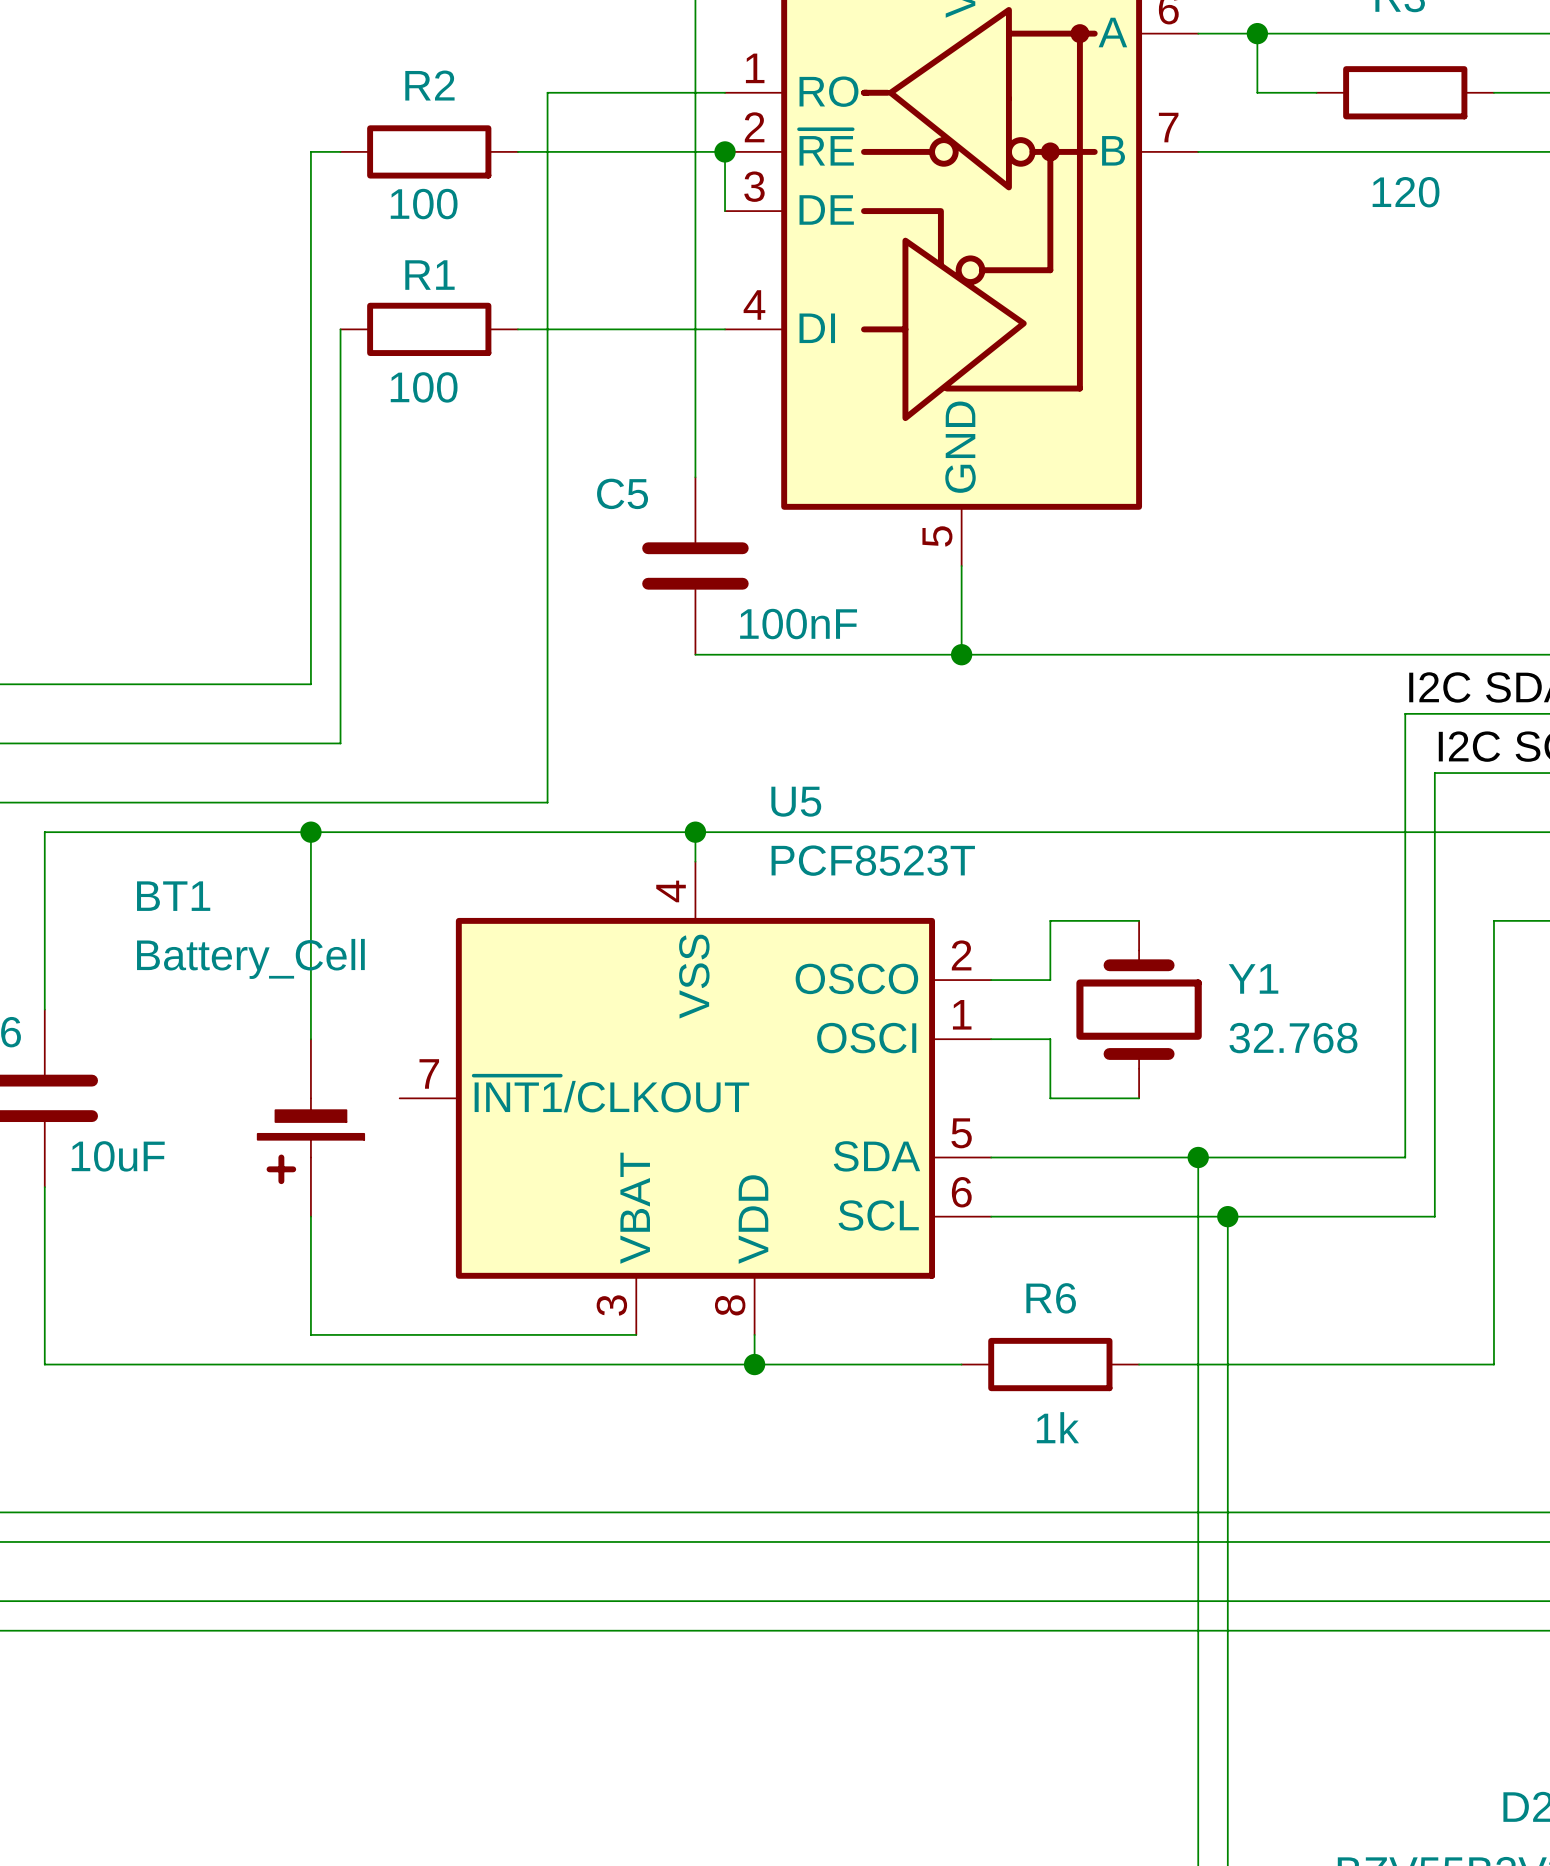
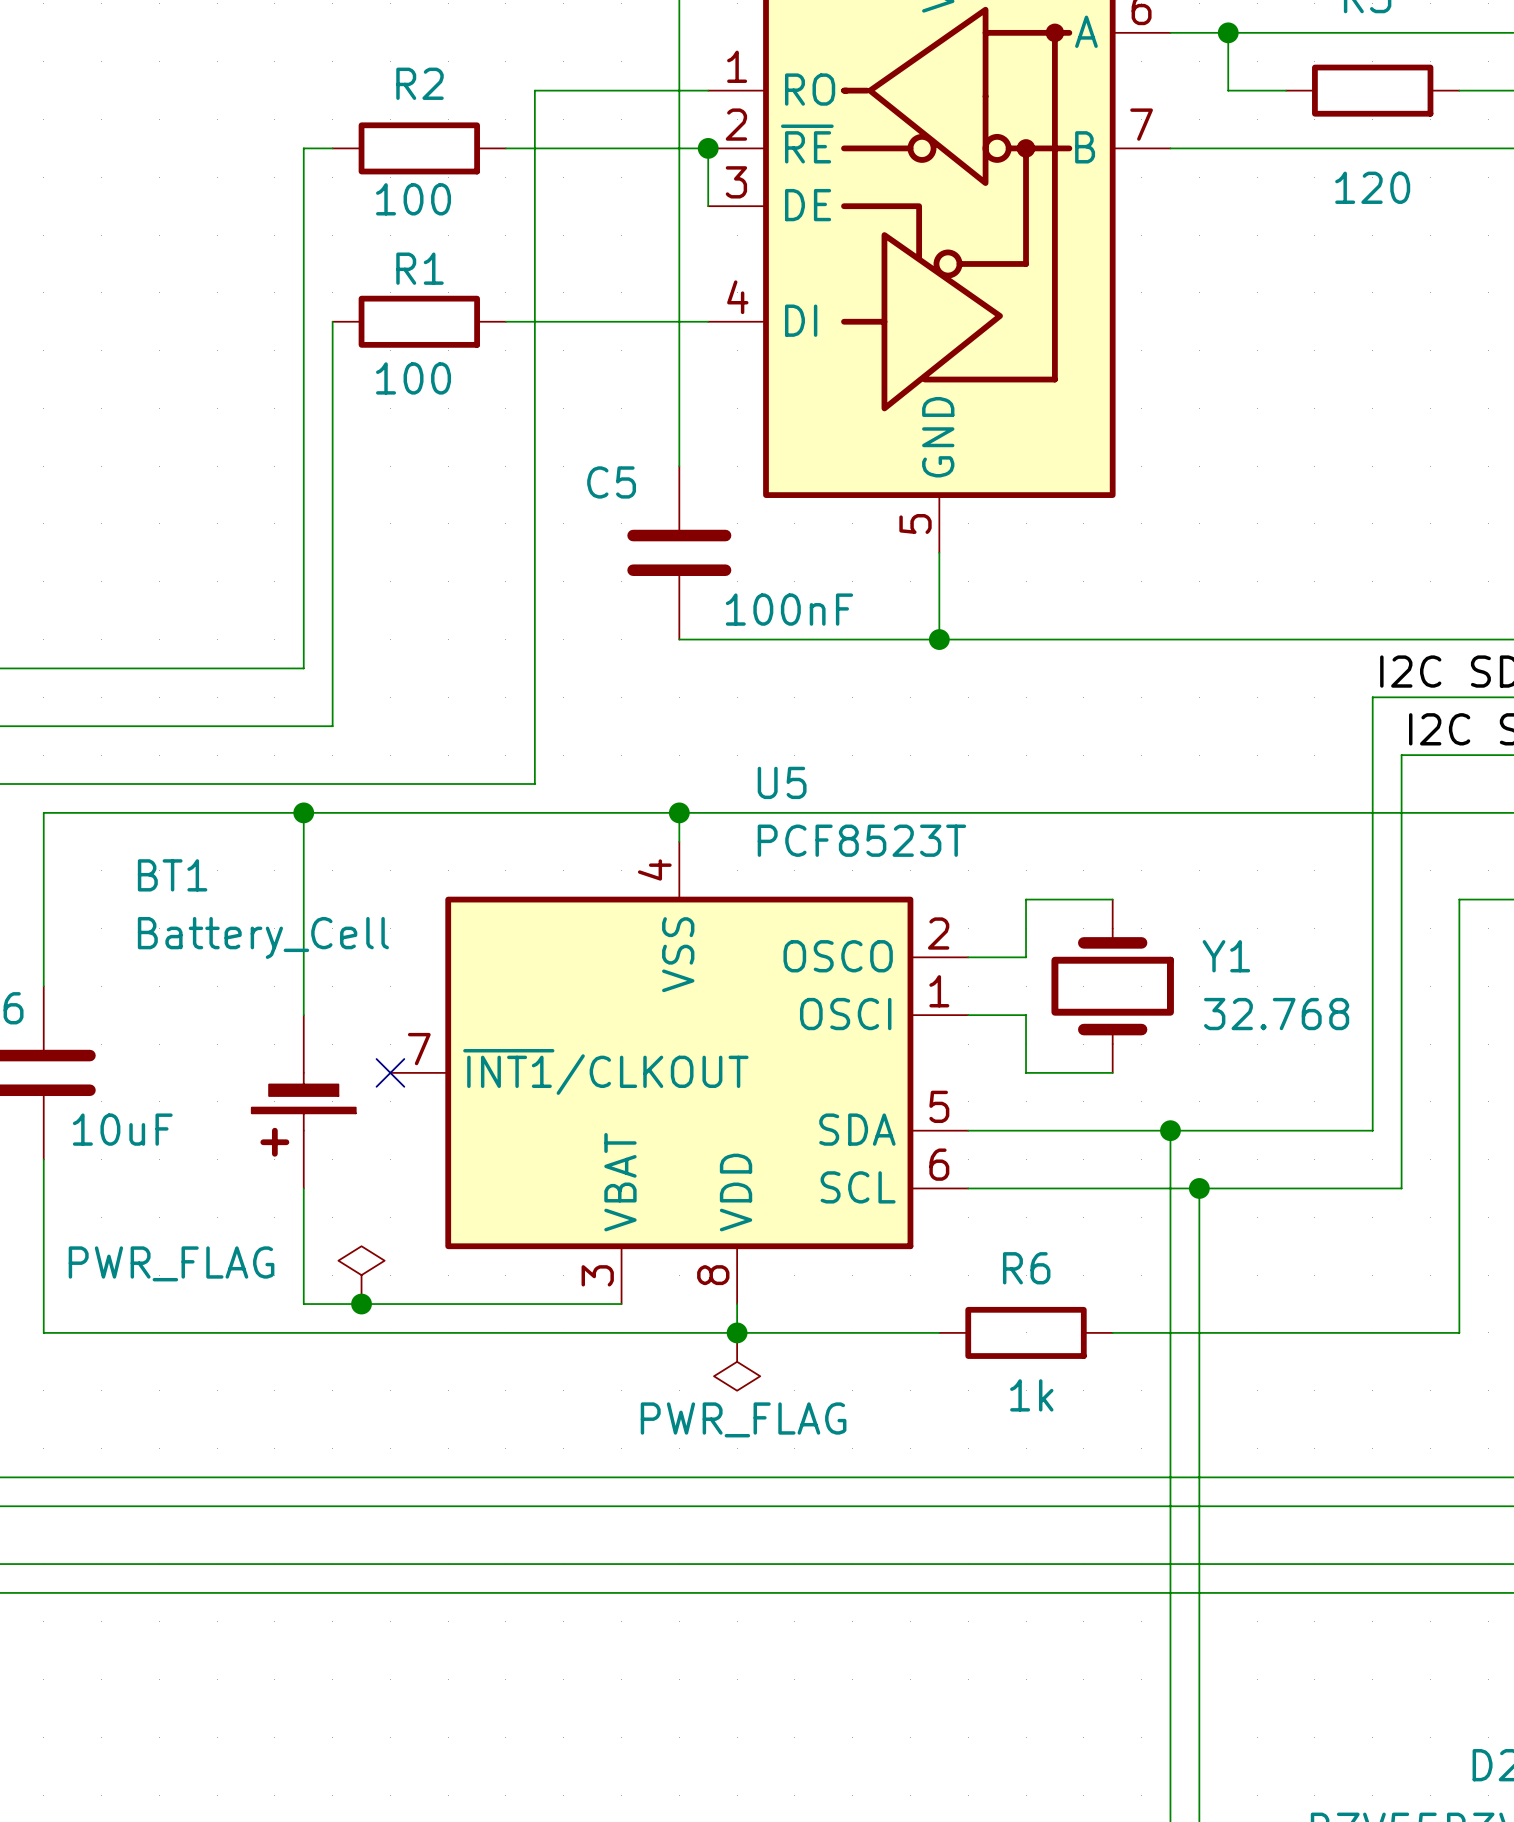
no-connect mark: none -> (390, 1072)
power symbol: none -> PWR_FLAG (361, 1275)
junction: none -> (361, 1304)
power symbol: none -> PWR_FLAG (737, 1361)

